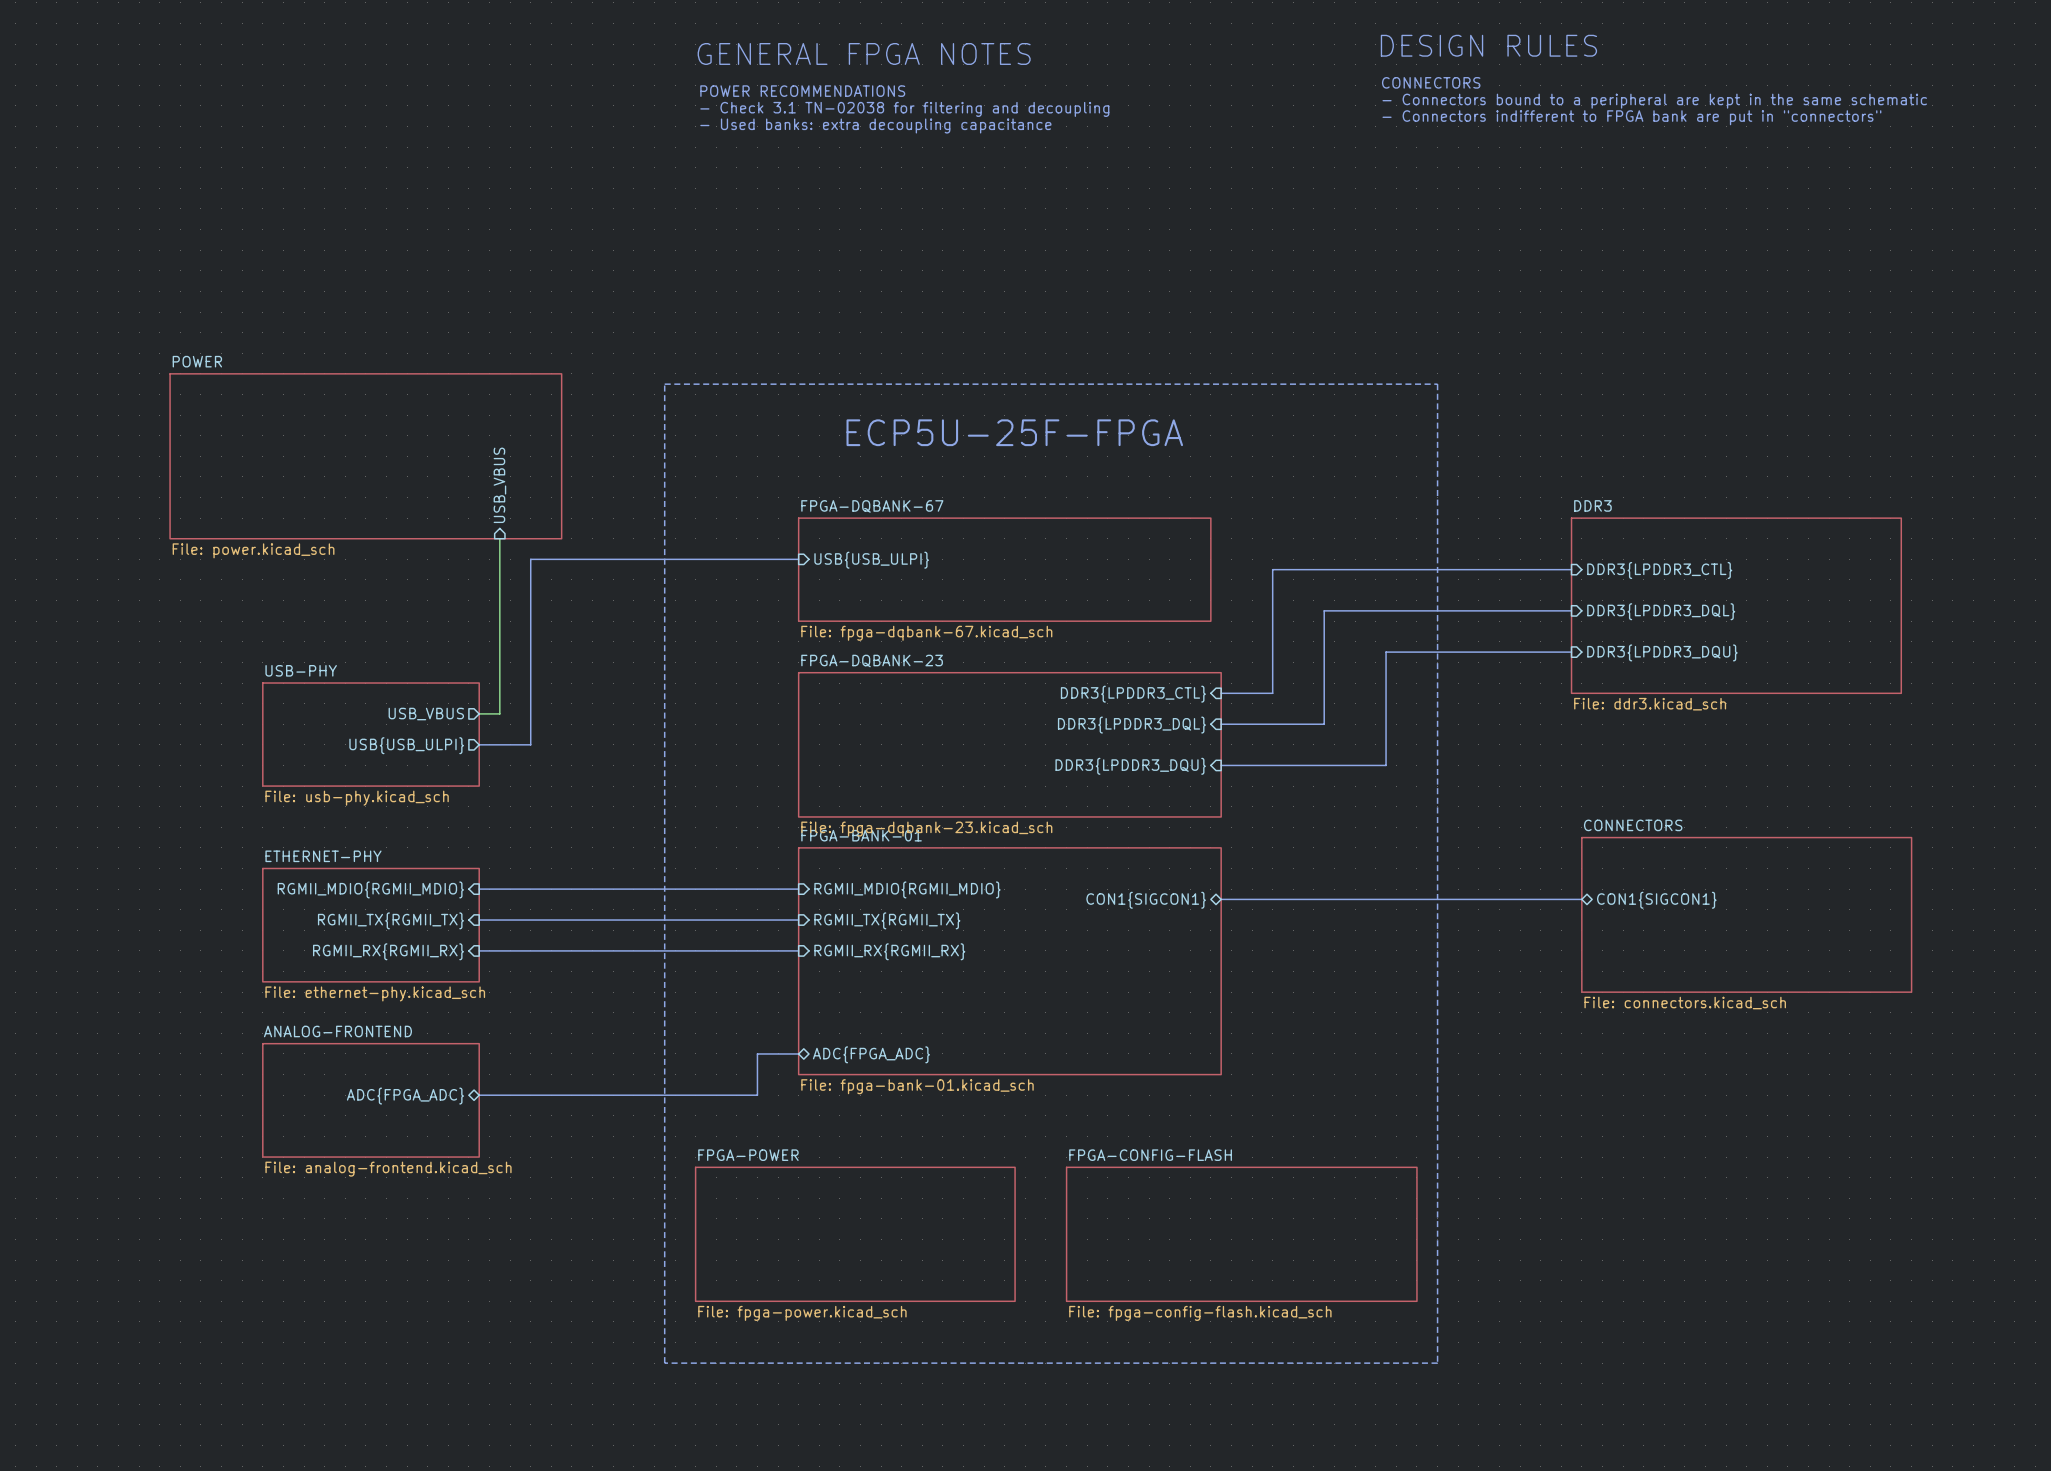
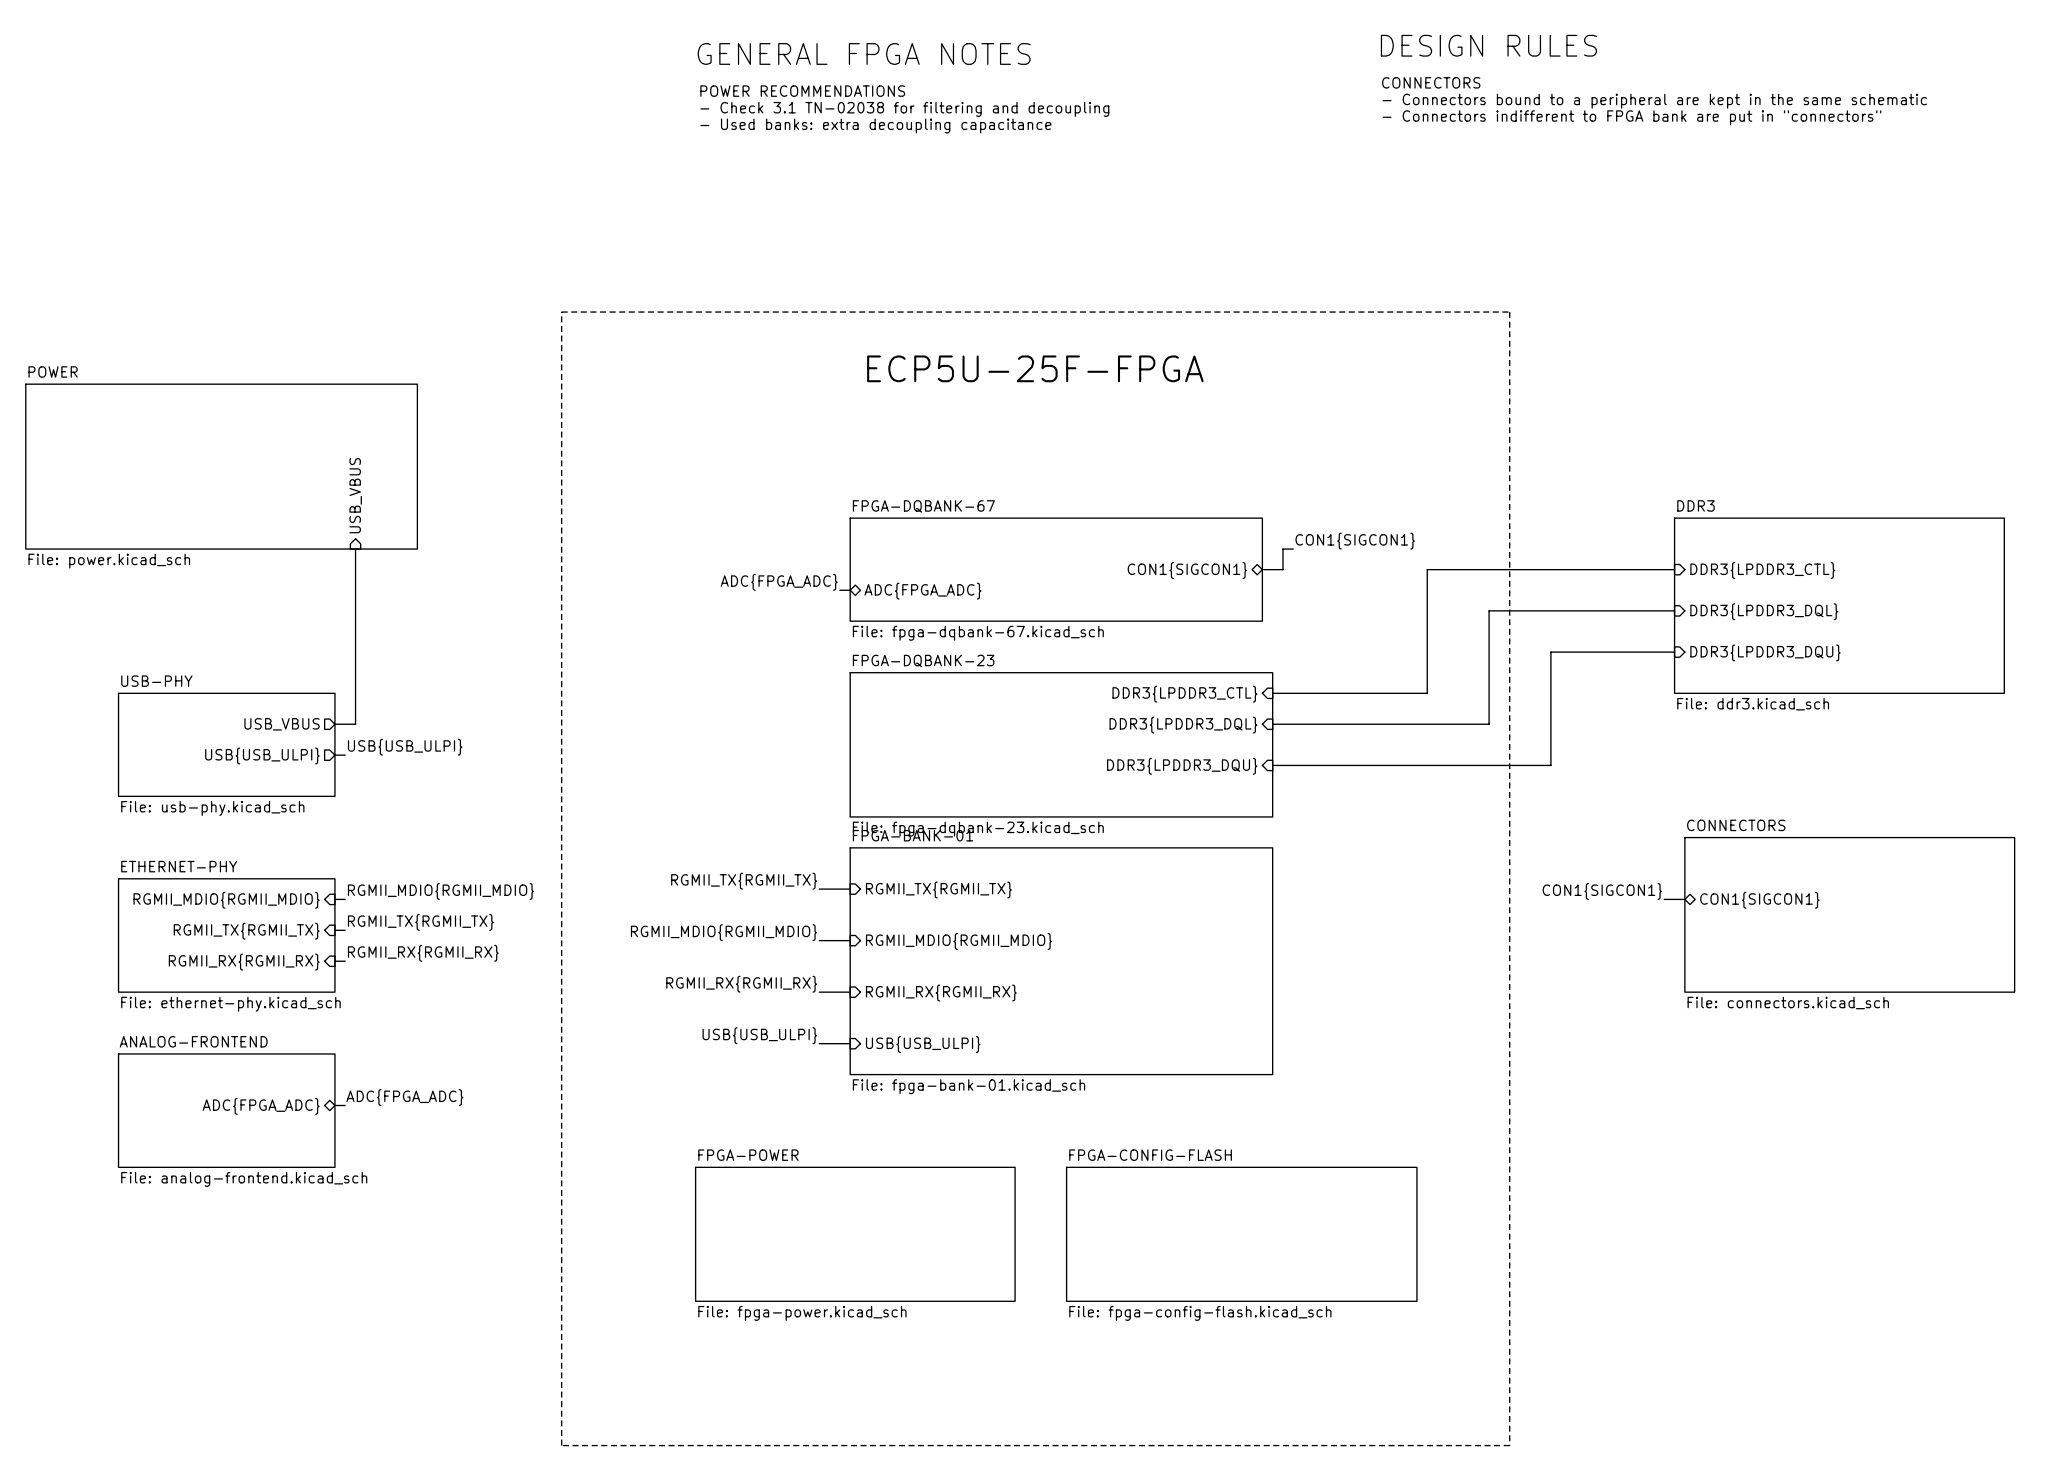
line: (664, 384) (1437, 384) (1437, 1363) (664, 1363) (664, 384) -> (561, 312) (561, 1445) (1509, 1445) (1509, 312) (561, 312)
text position: ECP5U-25F-FPGA (1014, 432) -> ECP5U-25F-FPGA (1035, 368)
sheet POWER position: (365, 456) -> (221, 466)
sheet pin: USB_VBUS (499, 485) -> none
sheet pin: none -> USB_VBUS (355, 495)
wire: (499, 538) (499, 713) (479, 713) -> (355, 549) (355, 724) (334, 724)
label: none -> CON1{SIGCON1} (1355, 541)
bus: none -> (1293, 549) (1282, 549) (1282, 569)
bus: (798, 559) (530, 559) (530, 744) (479, 744) -> none
sheet pin: USB{USB_ULPI} (871, 560) -> none
sheet FPGA-DQBANK-67 position: (1004, 569) -> (1056, 569)
bus: (1272, 569) (1272, 693) (1221, 693) -> (1272, 569) (1262, 569)
bus: (1282, 569) (1427, 569) -> (1272, 693) (1427, 693) (1427, 569)
bus: none -> (1571, 569) (1674, 569)
sheet pin: none -> CON1{SIGCON1} (1187, 570)
sheet pin position: DDR3{LPDDR3_CTL} (1659, 570) -> DDR3{LPDDR3_CTL} (1762, 570)
label: none -> ADC{FPGA_ADC} (779, 582)
bus: none -> (839, 590) (850, 590)
sheet pin: none -> ADC{FPGA_ADC} (922, 591)
sheet DDR3 position: (1736, 605) -> (1839, 605)
bus: (1489, 610) (1324, 610) (1324, 724) -> (1489, 610) (1489, 724) (1324, 724)
bus: none -> (1571, 610) (1674, 610)
sheet pin position: DDR3{LPDDR3_DQL} (1661, 611) -> DDR3{LPDDR3_DQL} (1764, 611)
bus: (1550, 652) (1386, 652) (1386, 765) -> (1550, 652) (1550, 765) (1386, 765)
bus: none -> (1571, 652) (1674, 652)
sheet pin position: DDR3{LPDDR3_DQU} (1662, 652) -> DDR3{LPDDR3_DQU} (1765, 652)
sheet pin position: DDR3{LPDDR3_CTL} (1133, 694) -> DDR3{LPDDR3_CTL} (1184, 694)
sheet pin: USB_VBUS (426, 714) -> none
sheet pin: none -> USB_VBUS (282, 724)
bus: (1221, 724) (1272, 724) -> none
sheet pin position: DDR3{LPDDR3_DQL} (1131, 725) -> DDR3{LPDDR3_DQL} (1183, 725)
sheet USB-PHY position: (371, 734) -> (226, 744)
sheet FPGA-DQBANK-23 position: (1009, 744) -> (1061, 744)
sheet pin position: USB{USB_ULPI} (406, 745) -> USB{USB_ULPI} (262, 755)
label: none -> USB{USB_ULPI} (405, 747)
bus: none -> (334, 755) (345, 755)
bus: (1221, 765) (1272, 765) -> none
sheet pin position: DDR3{LPDDR3_DQU} (1130, 766) -> DDR3{LPDDR3_DQU} (1182, 766)
label: none -> RGMII_TX{RGMII_TX} (744, 881)
sheet pin position: RGMII_MDIO{RGMII_MDIO} (370, 889) -> RGMII_MDIO{RGMII_MDIO} (226, 900)
bus: (479, 889) (798, 889) -> none
bus: none -> (819, 889) (850, 889)
sheet pin position: RGMII_MDIO{RGMII_MDIO} (907, 889) -> RGMII_MDIO{RGMII_MDIO} (959, 941)
label: none -> RGMII_MDIO{RGMII_MDIO} (441, 891)
label: none -> CON1{SIGCON1} (1602, 891)
bus: none -> (334, 899) (345, 899)
bus: (1221, 899) (1581, 899) -> none
bus: none -> (1664, 899) (1684, 899)
sheet pin: CON1{SIGCON1} (1146, 900) -> none
sheet pin position: CON1{SIGCON1} (1656, 900) -> CON1{SIGCON1} (1759, 900)
sheet CONNECTORS position: (1746, 914) -> (1849, 914)
sheet pin position: RGMII_TX{RGMII_TX} (390, 920) -> RGMII_TX{RGMII_TX} (246, 931)
bus: (479, 920) (798, 920) -> none
sheet pin position: RGMII_TX{RGMII_TX} (887, 920) -> RGMII_TX{RGMII_TX} (938, 889)
label: none -> RGMII_TX{RGMII_TX} (420, 922)
sheet ETHERNET-PHY position: (371, 925) -> (226, 935)
bus: none -> (334, 930) (345, 930)
label: none -> RGMII_MDIO{RGMII_MDIO} (723, 932)
bus: none -> (819, 940) (850, 940)
bus: (479, 950) (798, 950) -> none
sheet pin position: RGMII_RX{RGMII_RX} (388, 951) -> RGMII_RX{RGMII_RX} (244, 962)
sheet pin position: RGMII_RX{RGMII_RX} (889, 951) -> RGMII_RX{RGMII_RX} (941, 992)
label: none -> RGMII_RX{RGMII_RX} (423, 953)
bus: none -> (334, 961) (345, 961)
sheet FPGA-BANK-01 position: (1009, 961) -> (1061, 961)
label: none -> RGMII_RX{RGMII_RX} (741, 984)
bus: none -> (819, 992) (850, 992)
label: none -> USB{USB_ULPI} (759, 1035)
bus: none -> (819, 1043) (850, 1043)
sheet pin: none -> USB{USB_ULPI} (923, 1044)
bus: (798, 1053) (757, 1053) (757, 1095) (479, 1095) -> none
sheet pin: ADC{FPGA_ADC} (871, 1054) -> none
sheet pin position: ADC{FPGA_ADC} (405, 1096) -> ADC{FPGA_ADC} (261, 1106)
label: none -> ADC{FPGA_ADC} (404, 1097)
sheet ANALOG-FRONTEND position: (371, 1100) -> (226, 1110)
bus: none -> (334, 1105) (345, 1105)

